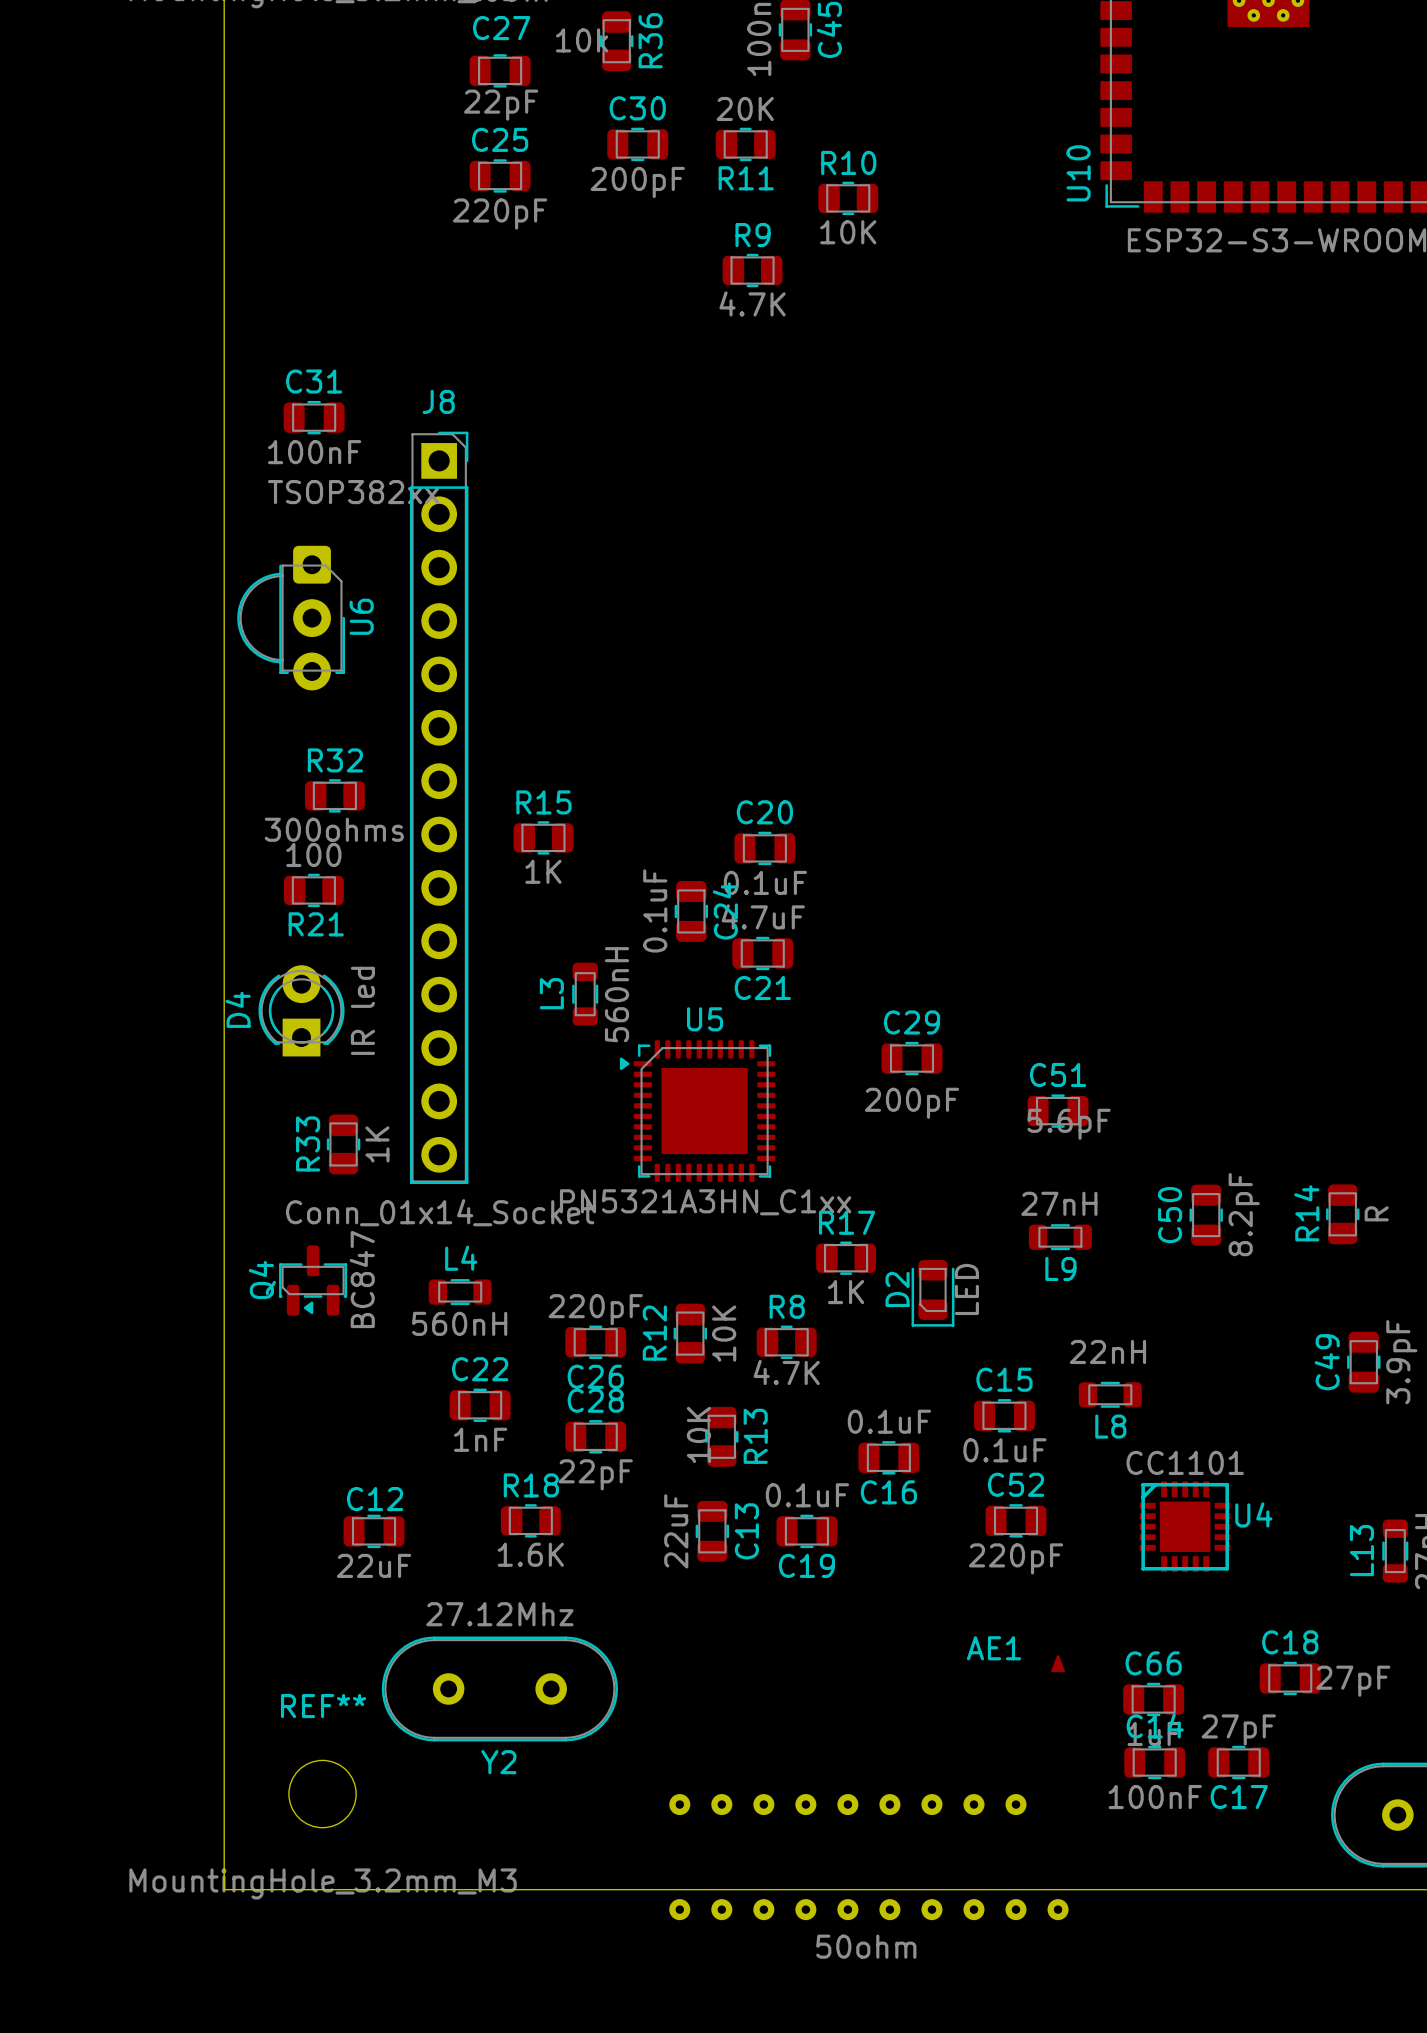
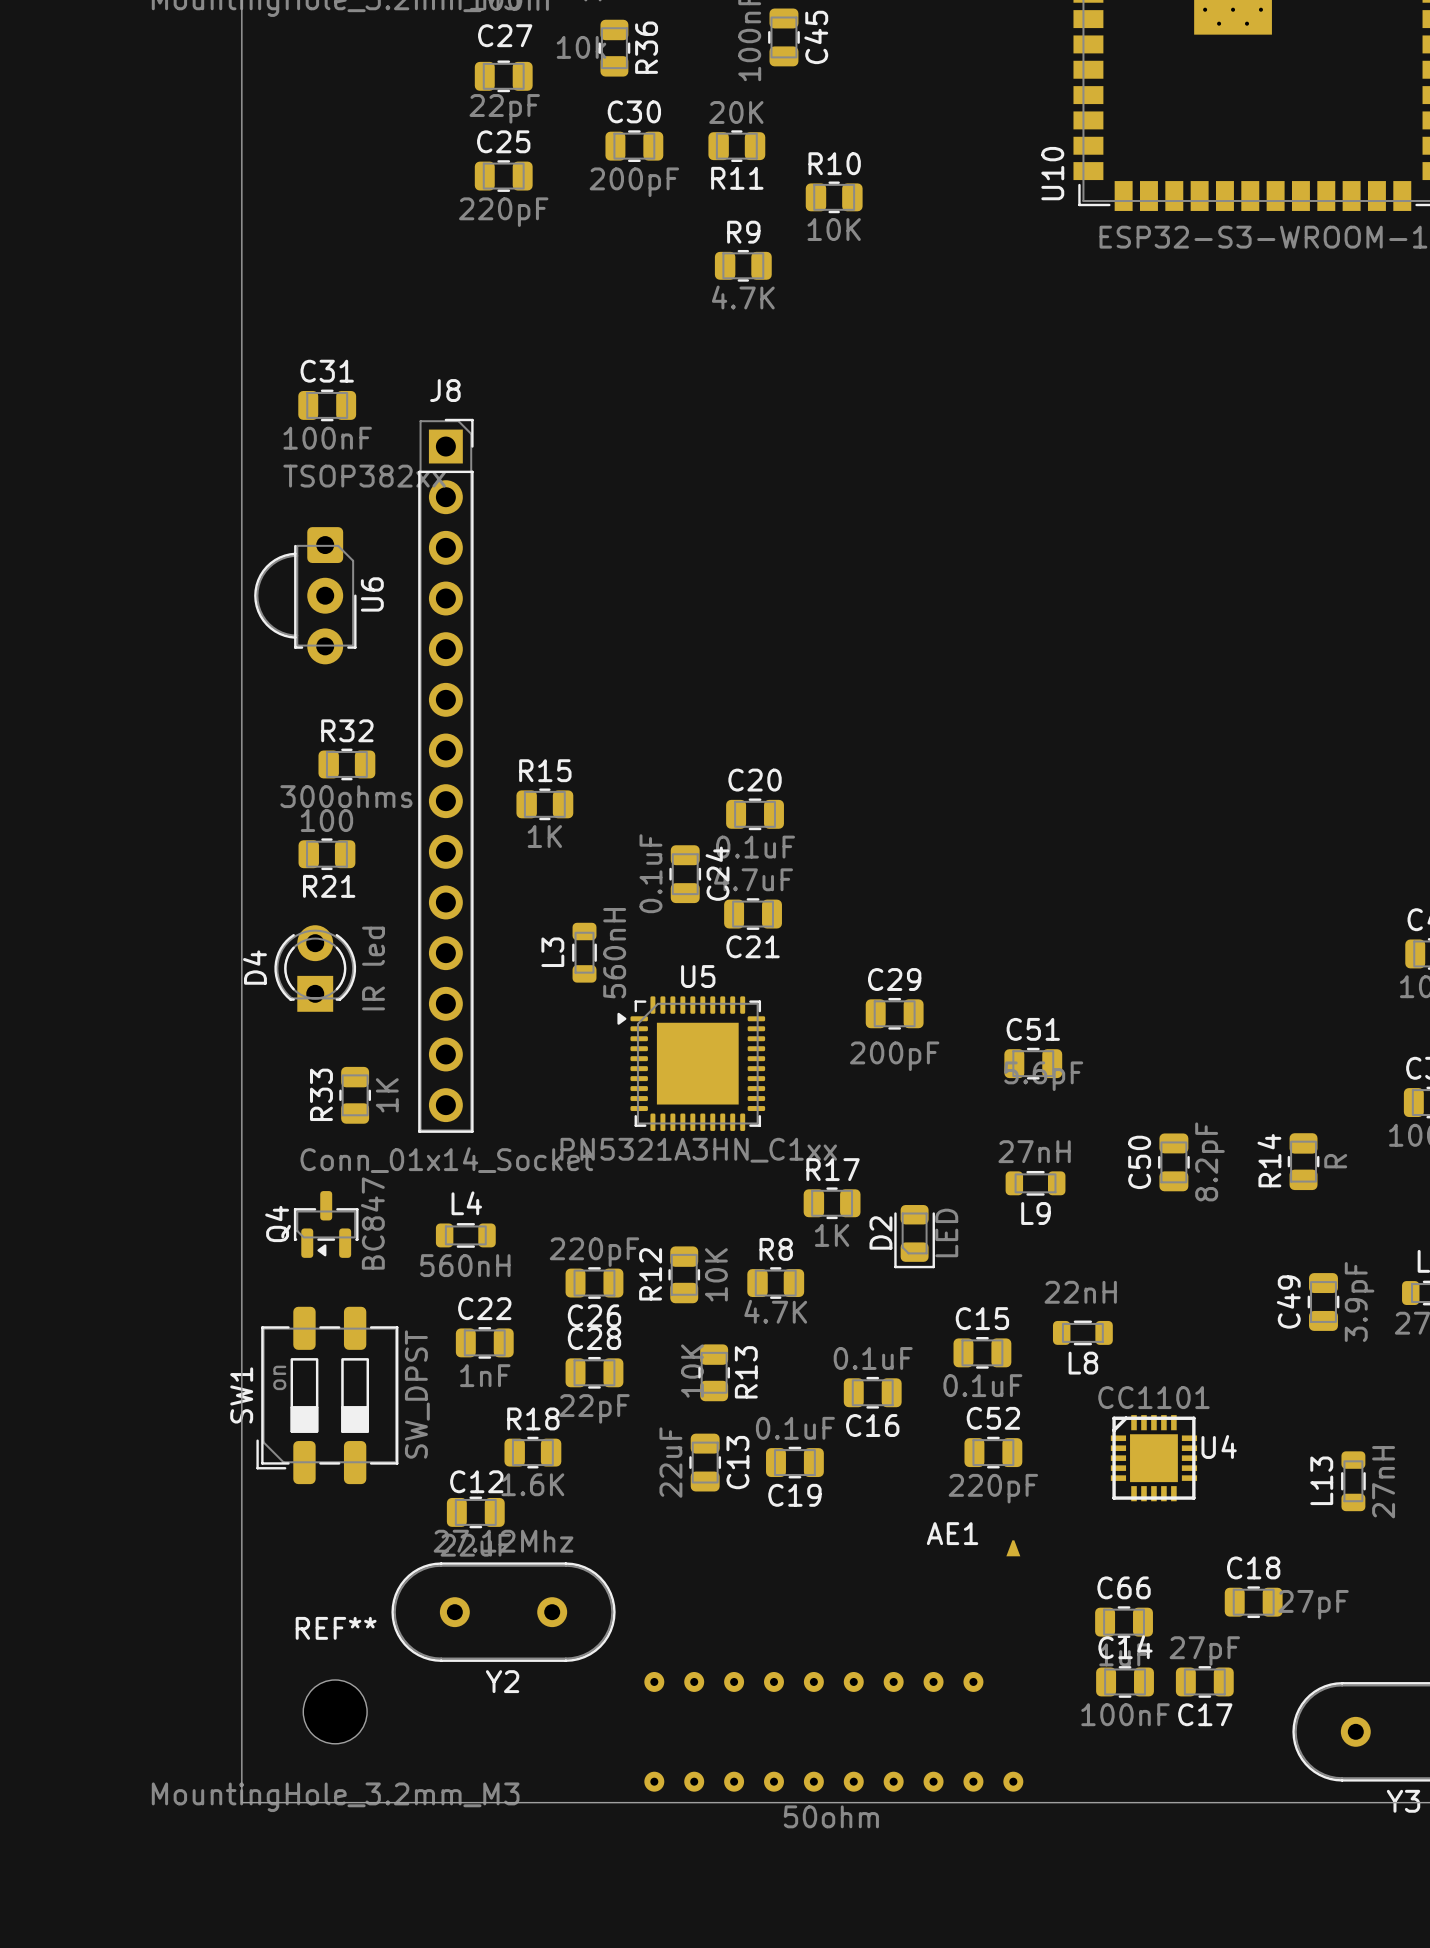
SW1: none -> SW_DPST (327, 1395)
C12 position: (374, 1531) -> (475, 1512)
AE1 position: (868, 1787) -> (833, 1666)

